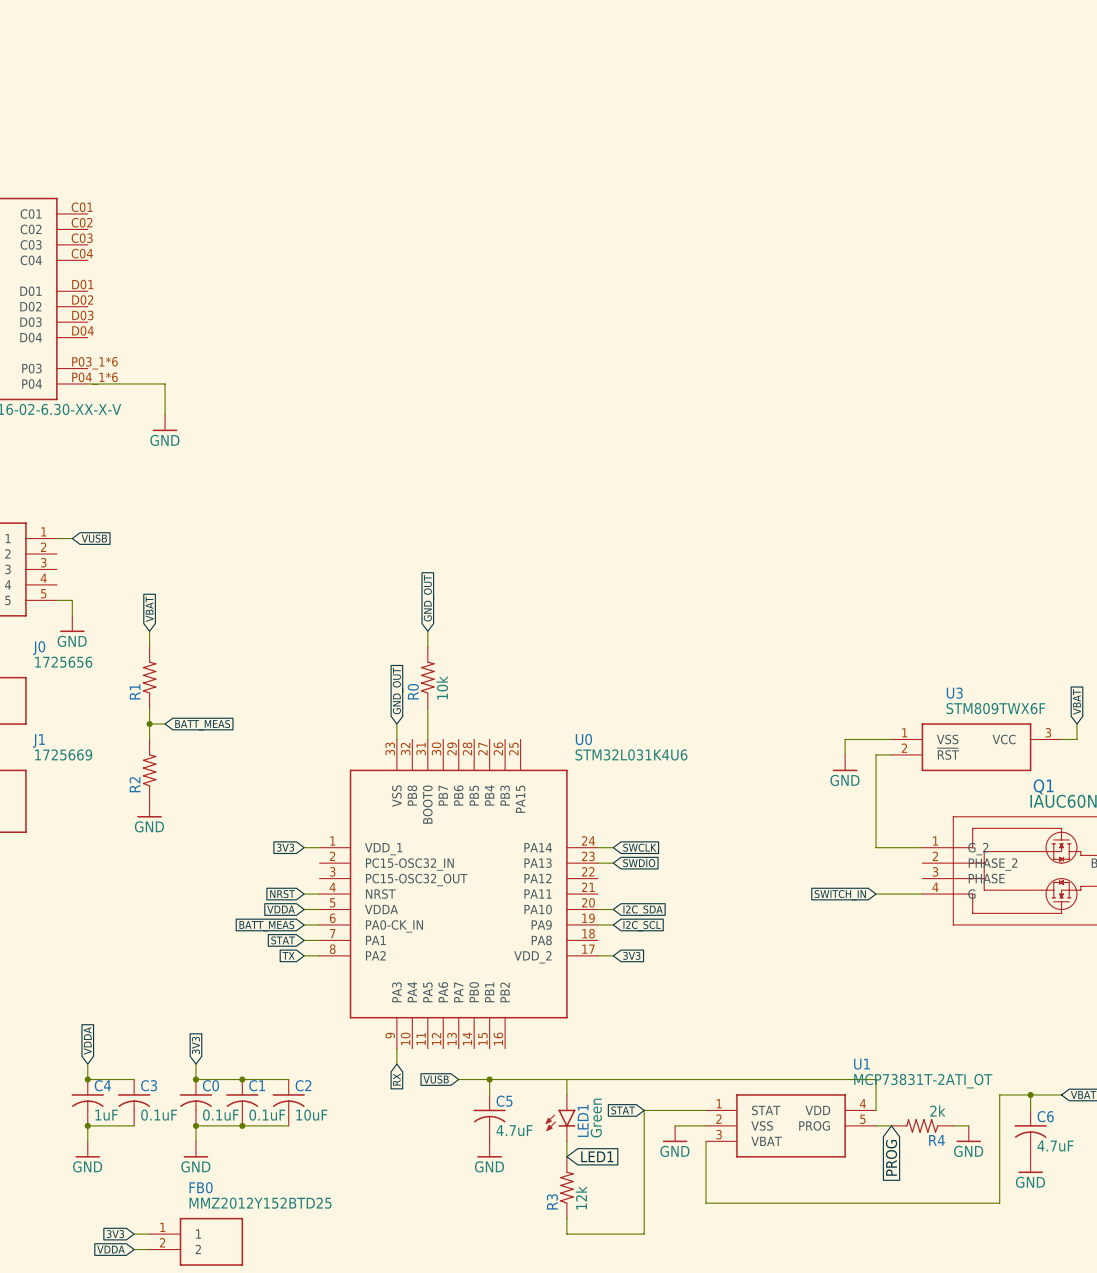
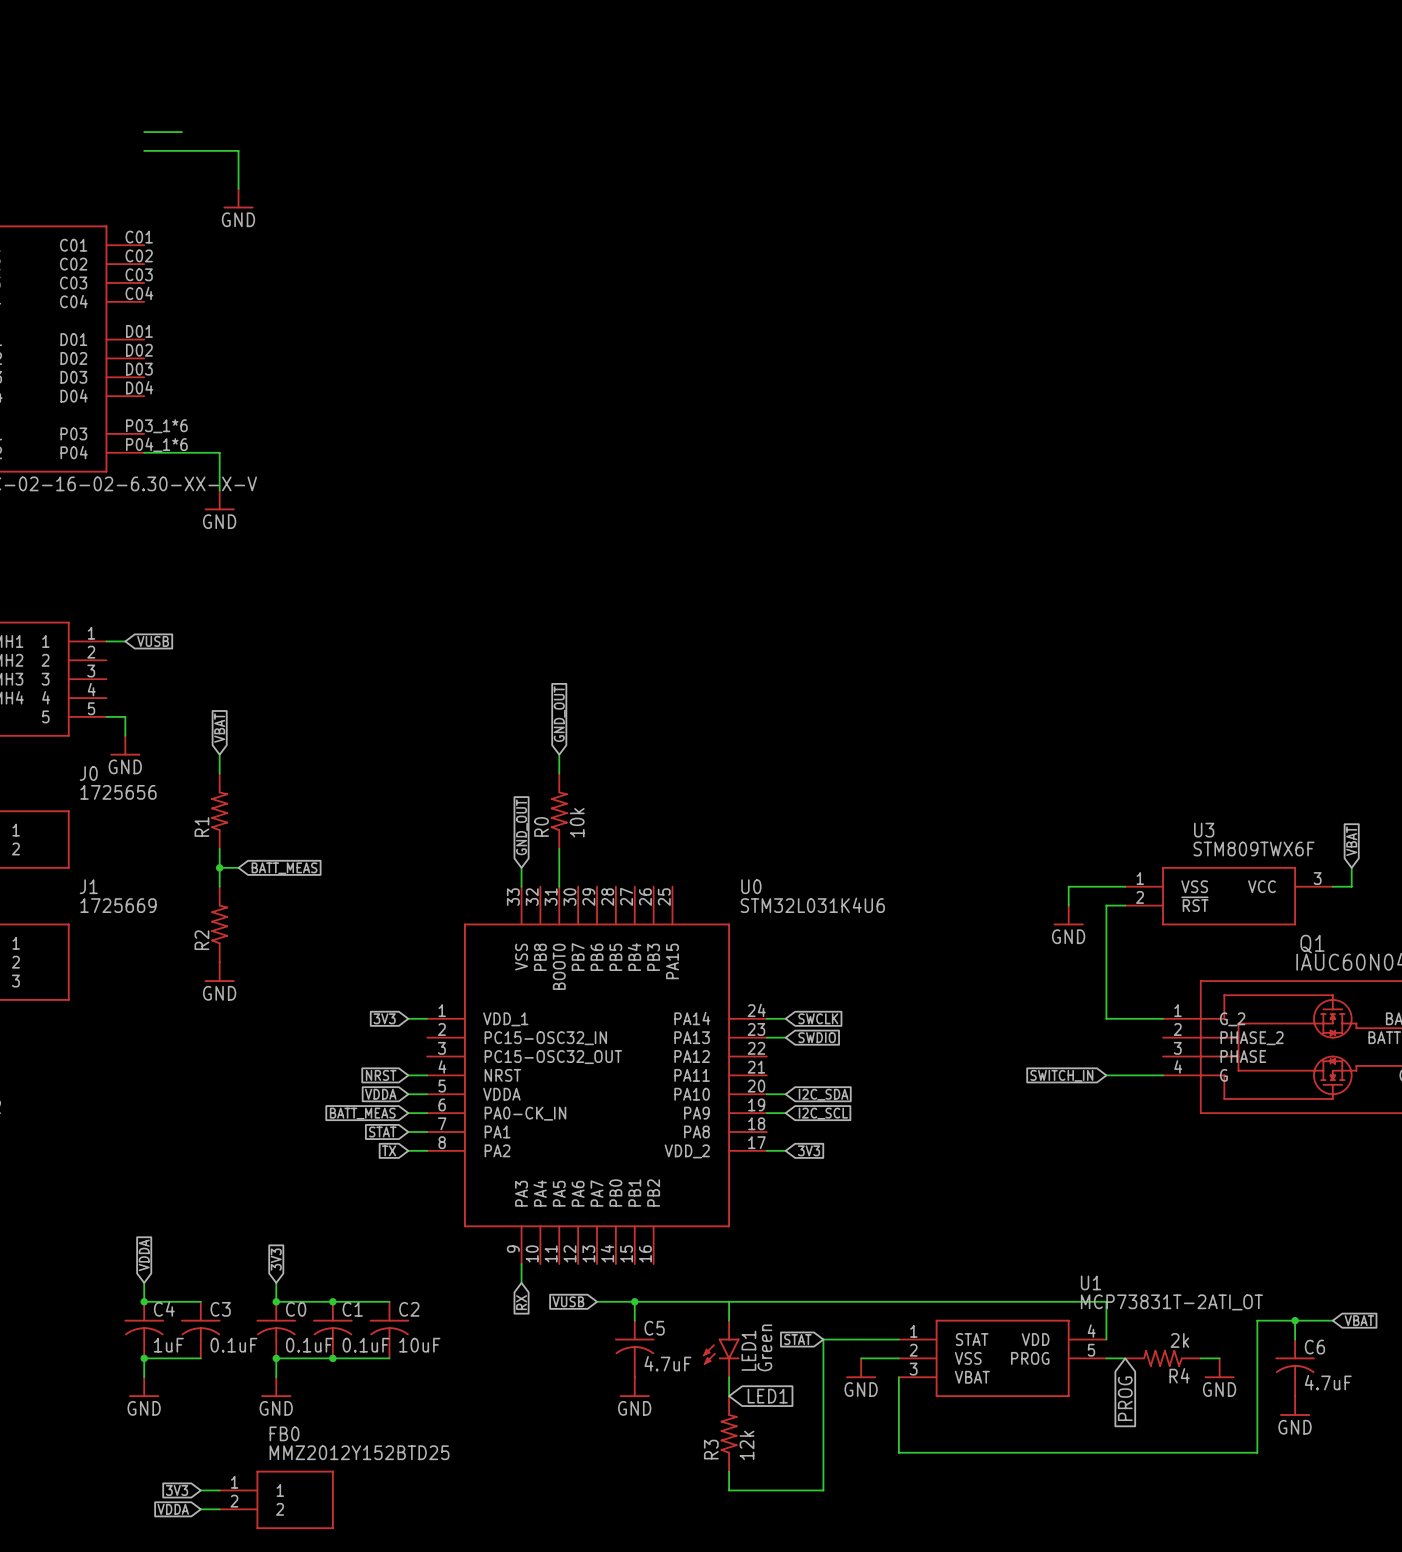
wire: none -> (144, 132) (181, 132)
wire: none -> (144, 150) (238, 150) (238, 188)
power symbol: none -> GND (238, 198)
wire: (149, 383) (165, 383) (165, 414) -> (219, 452) (219, 490)
power symbol position: GND (165, 423) -> GND (219, 500)

